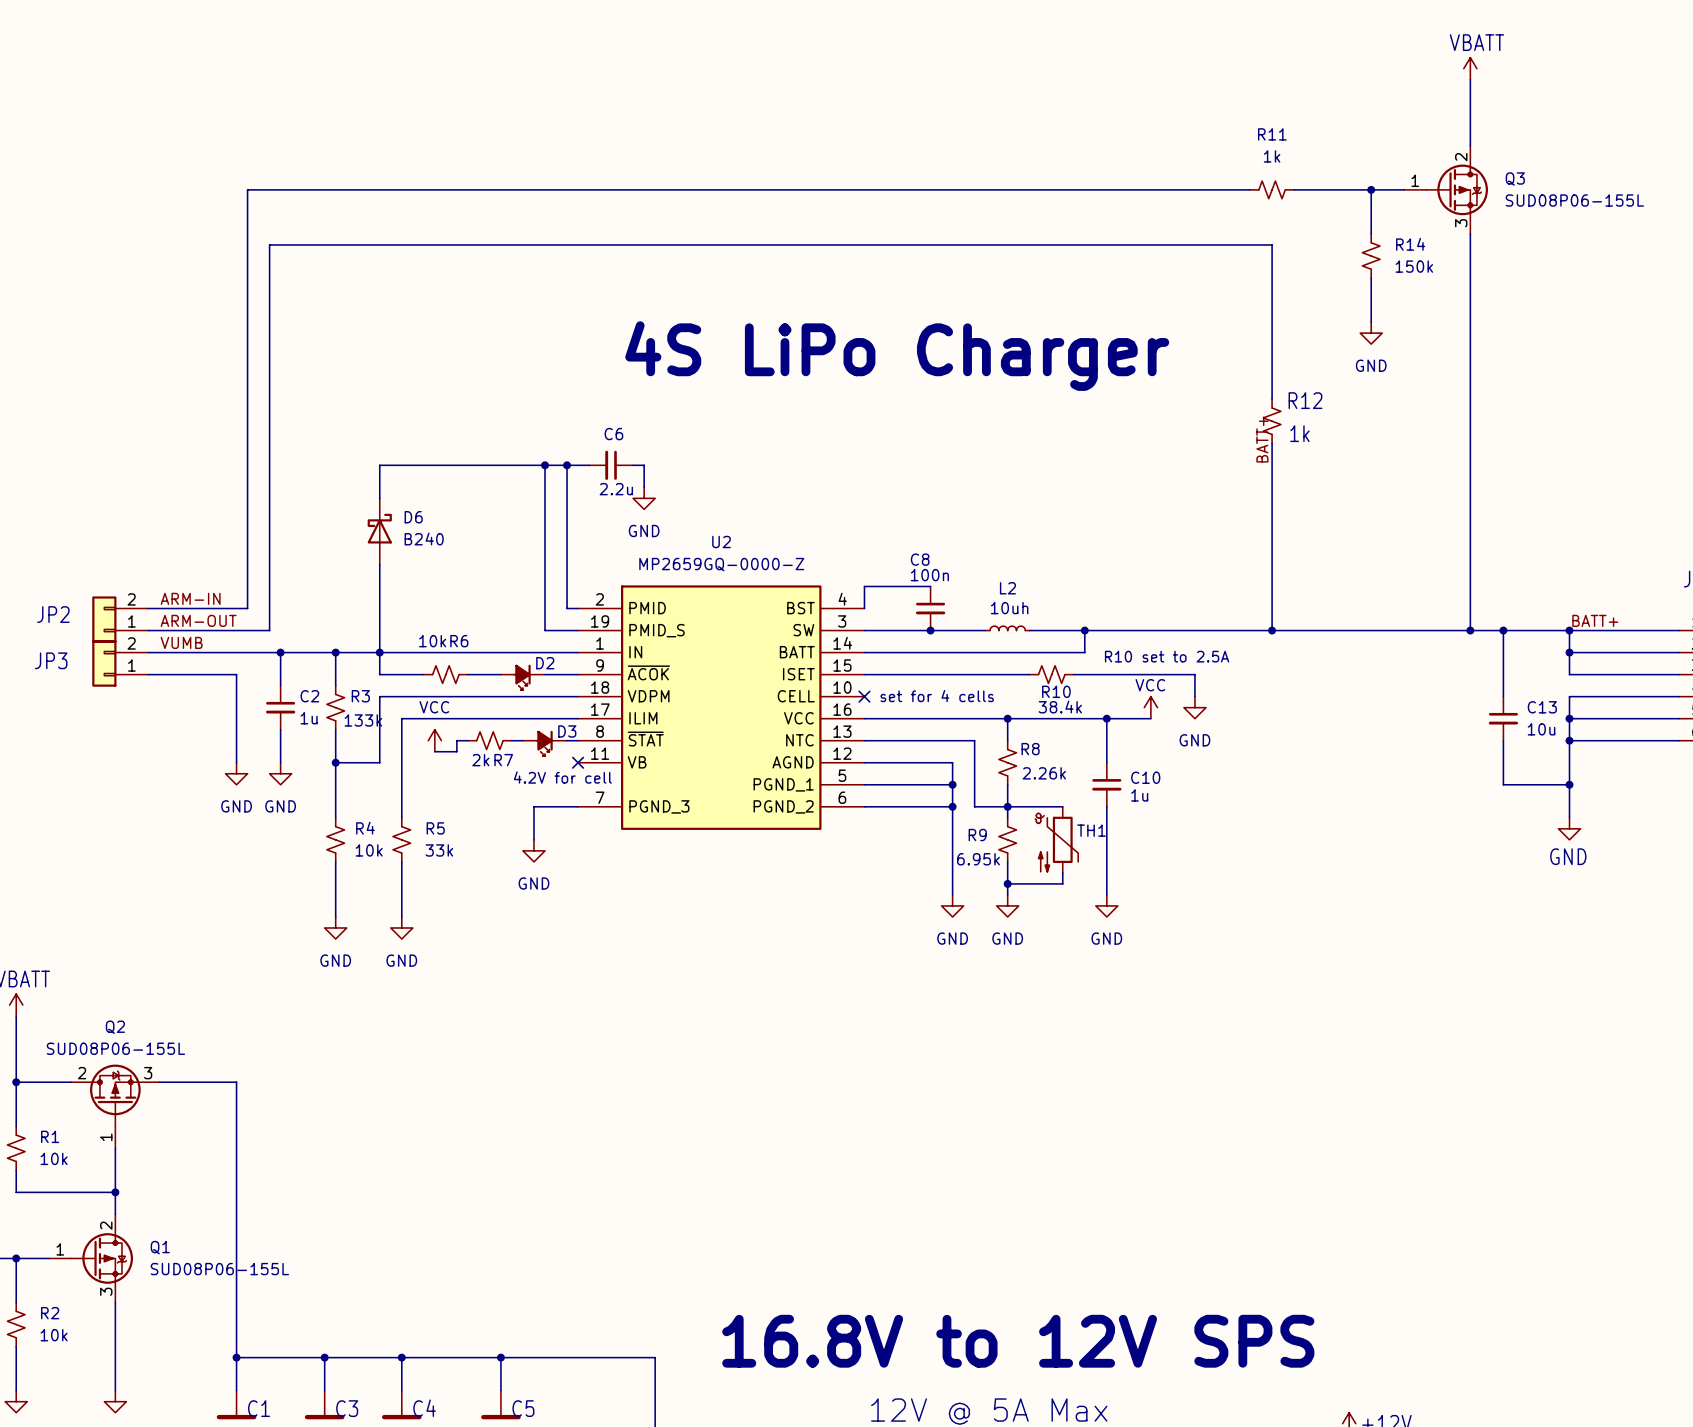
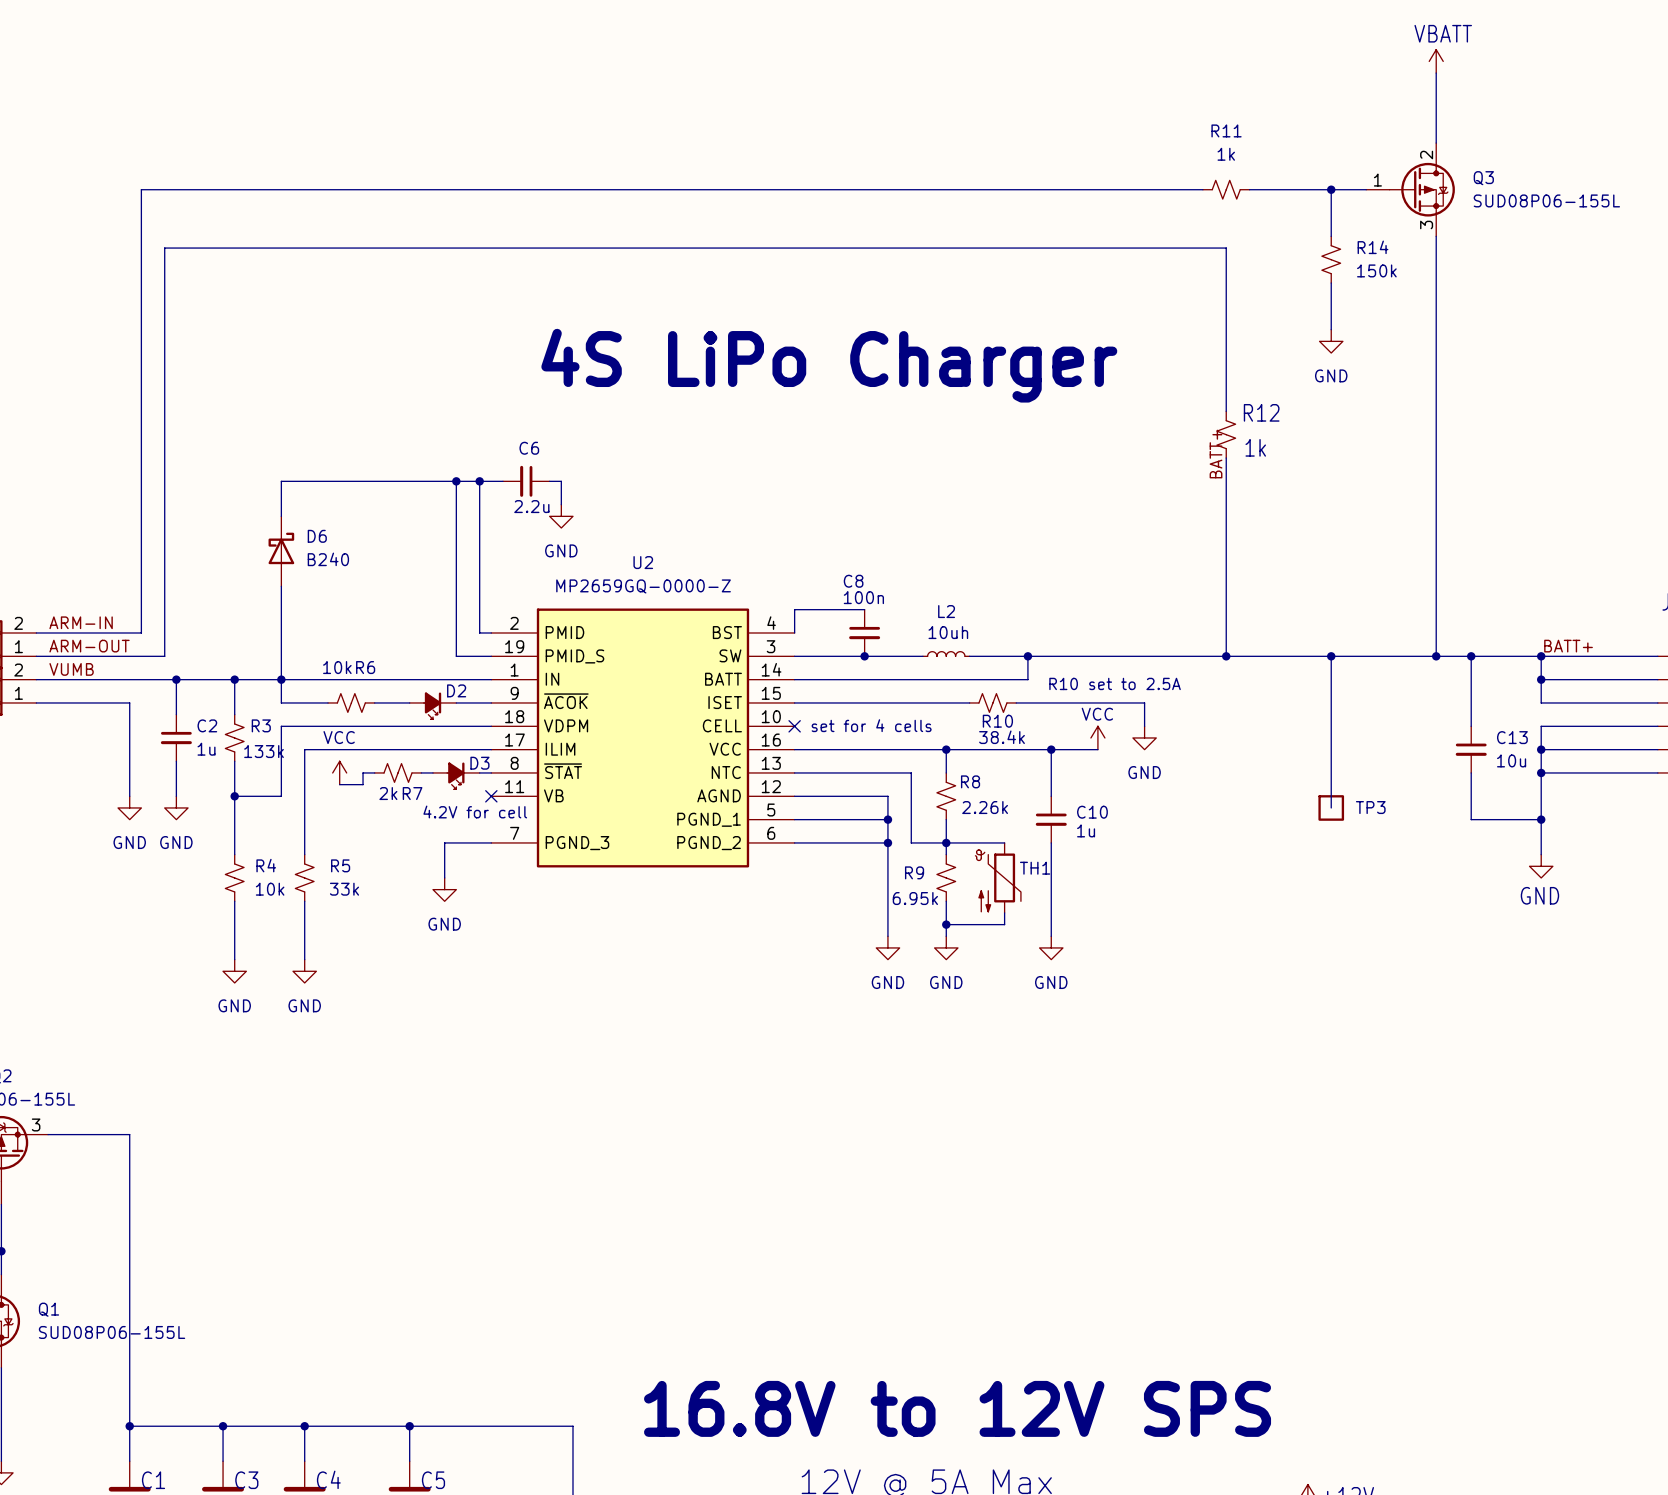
wire: none -> (1331, 656) (1331, 807)
junction: none -> (1331, 656)
TP3: none -> (1331, 807)

